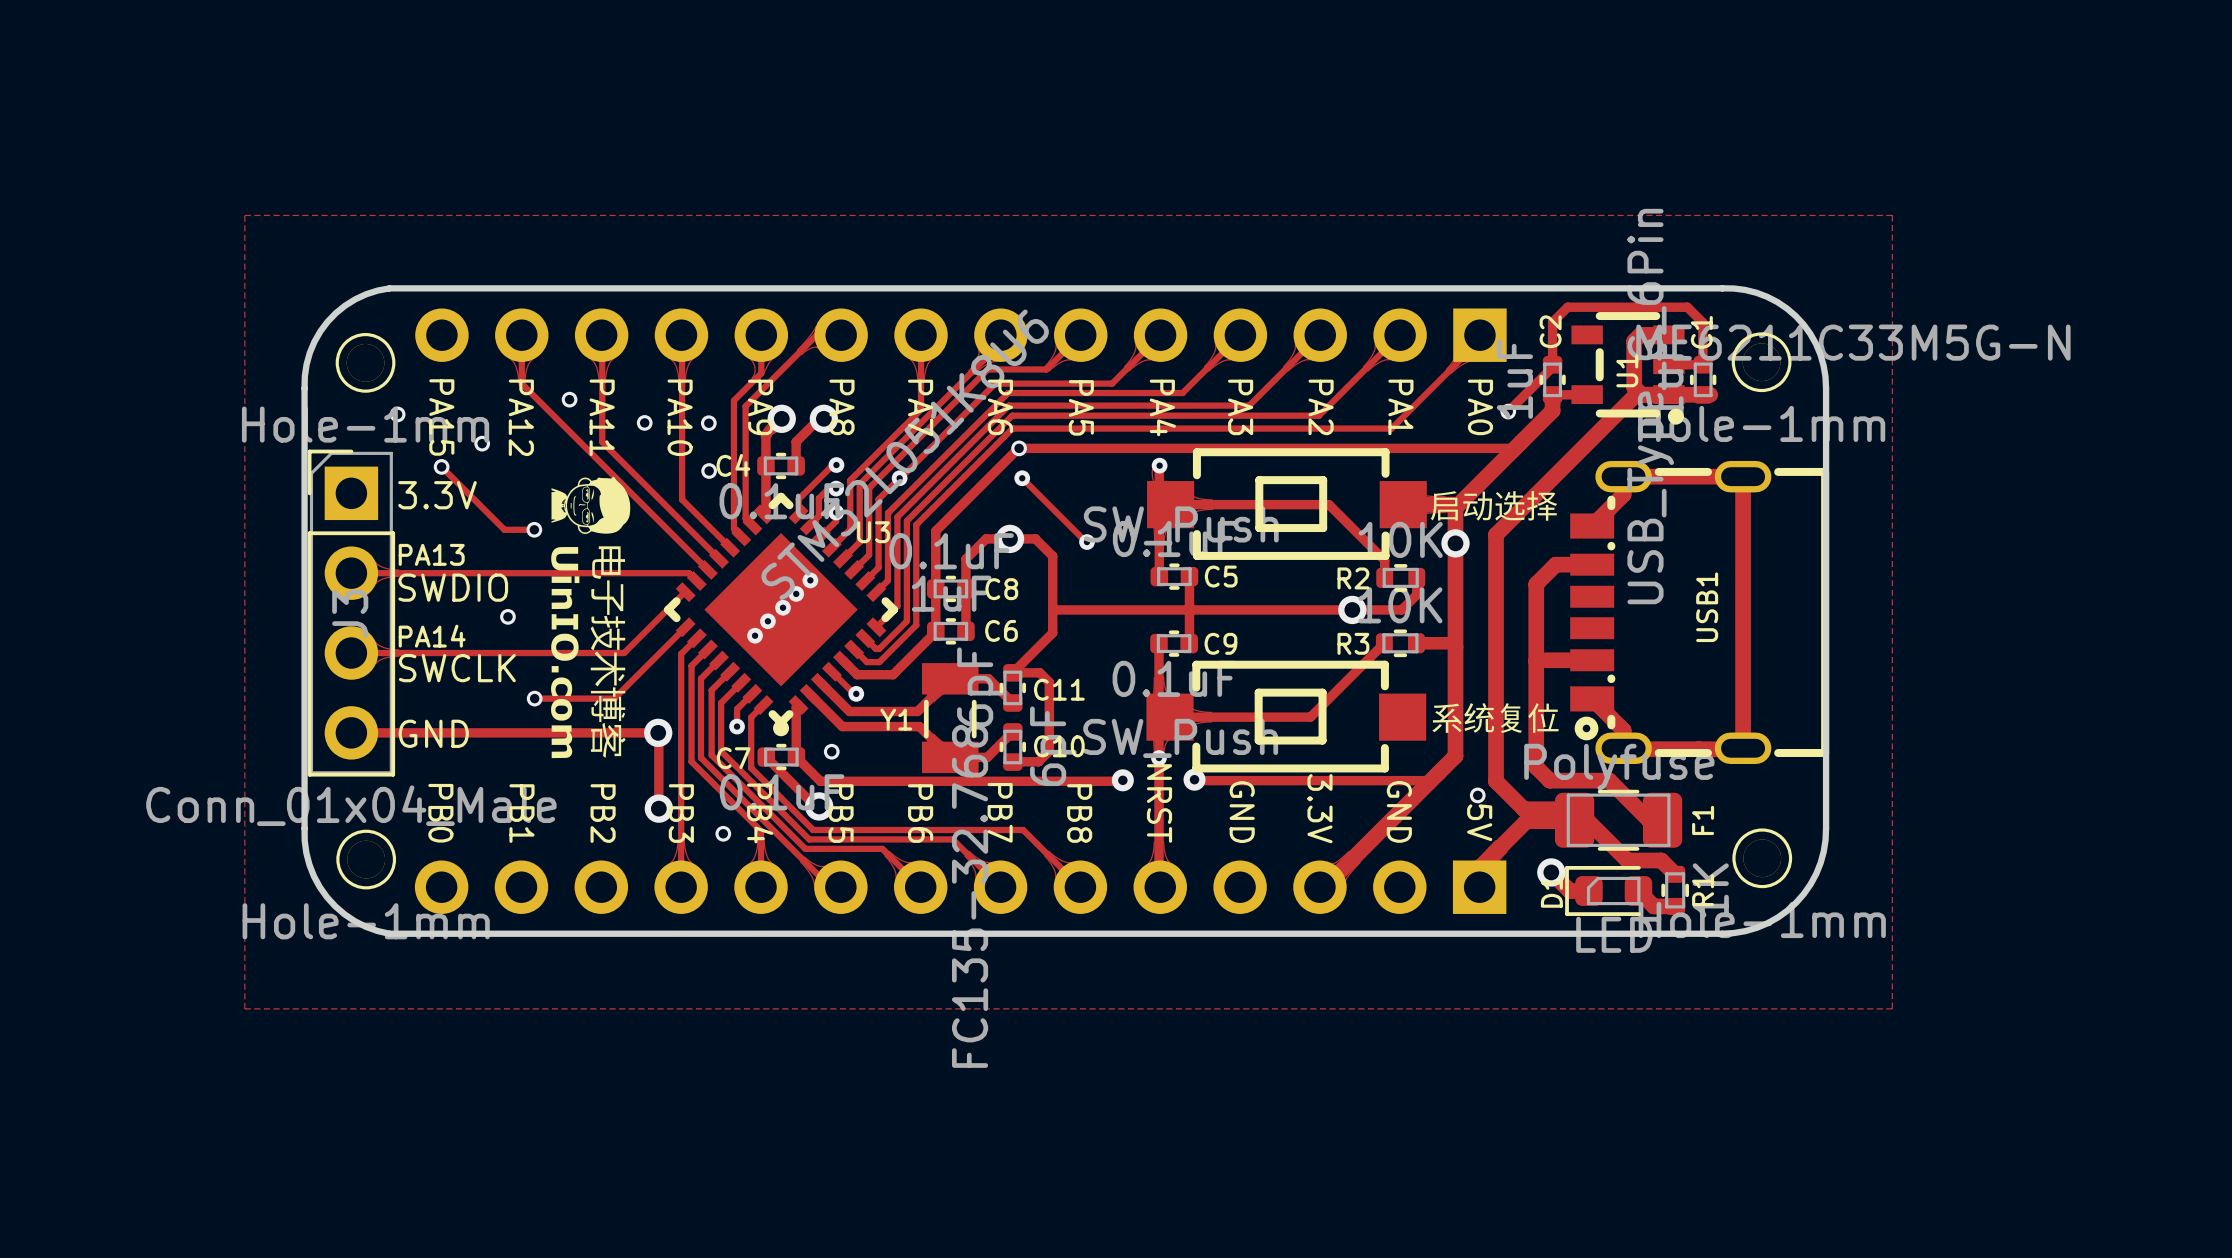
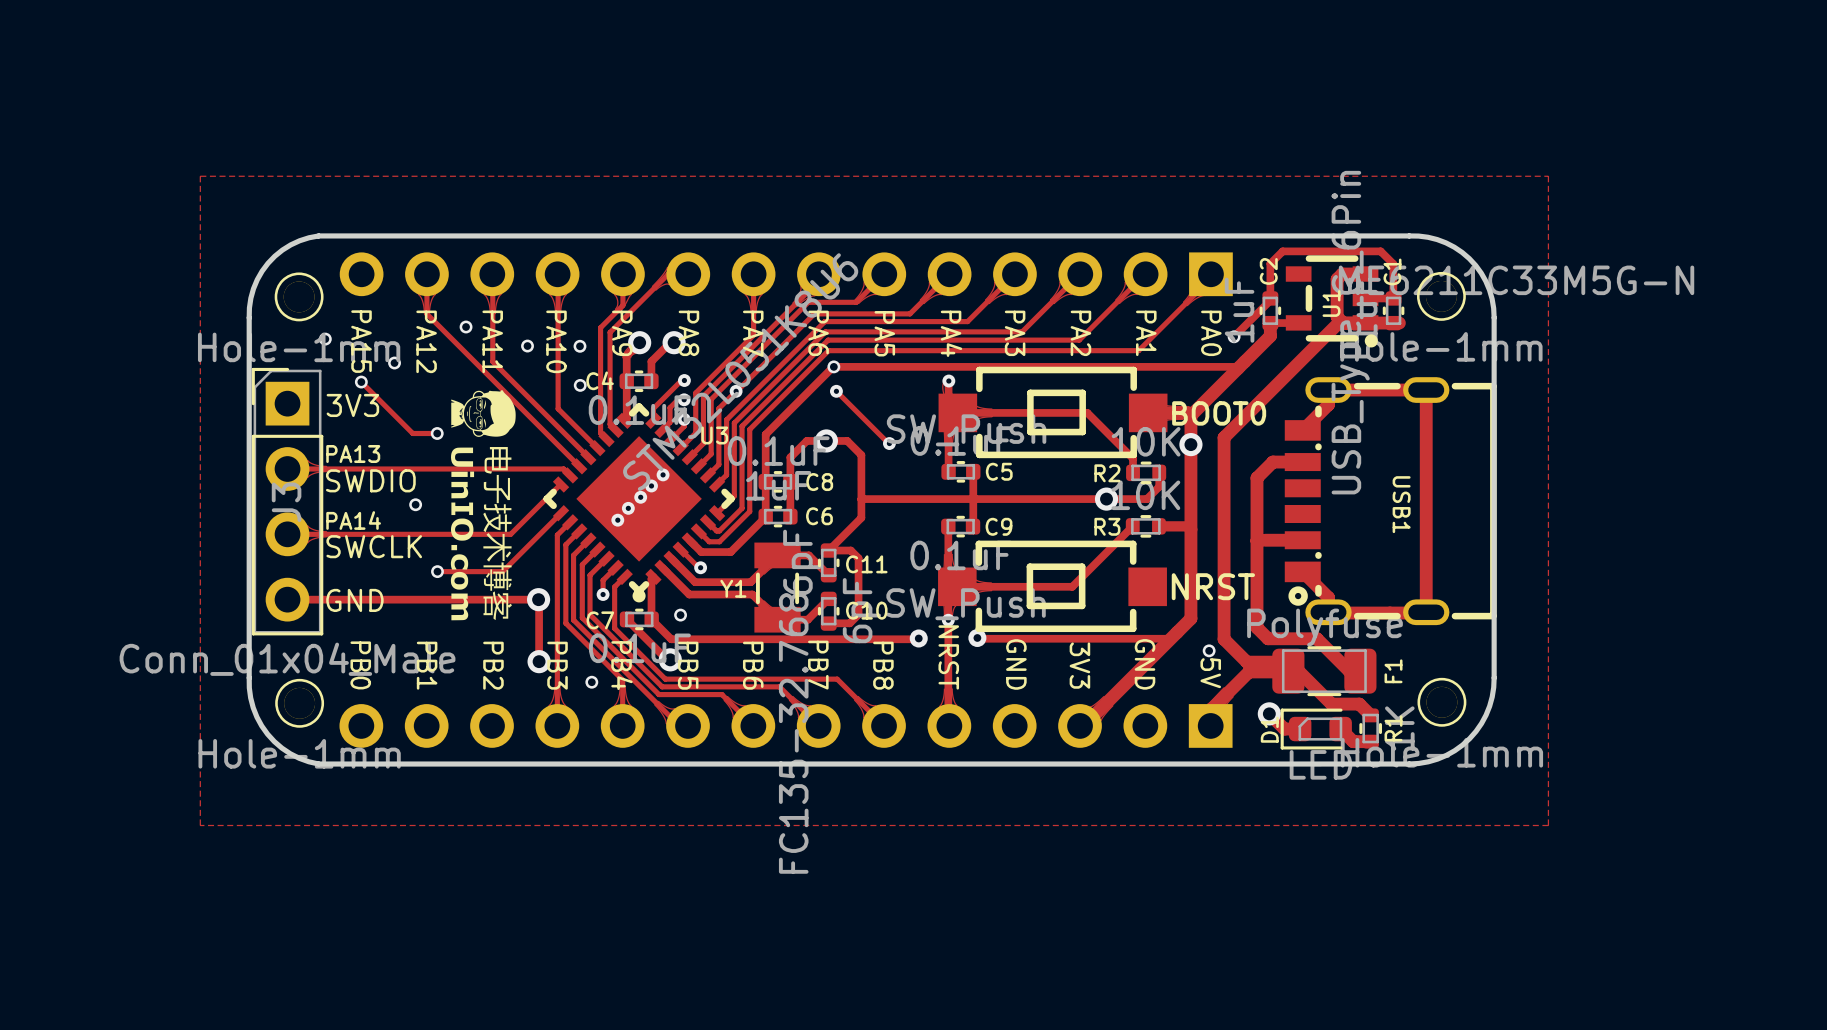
text: 3.3V (437, 495) -> 3V3 (352, 405)
text: 启动选择 (1494, 505) -> BOOT0 (1219, 413)
USB1 name rotation: 0° (1707, 607) -> 180° (1401, 504)
text: 系统复位 (1495, 718) -> NRST (1213, 586)
text: 3.3V (1319, 808) -> 3V3 (1079, 665)

